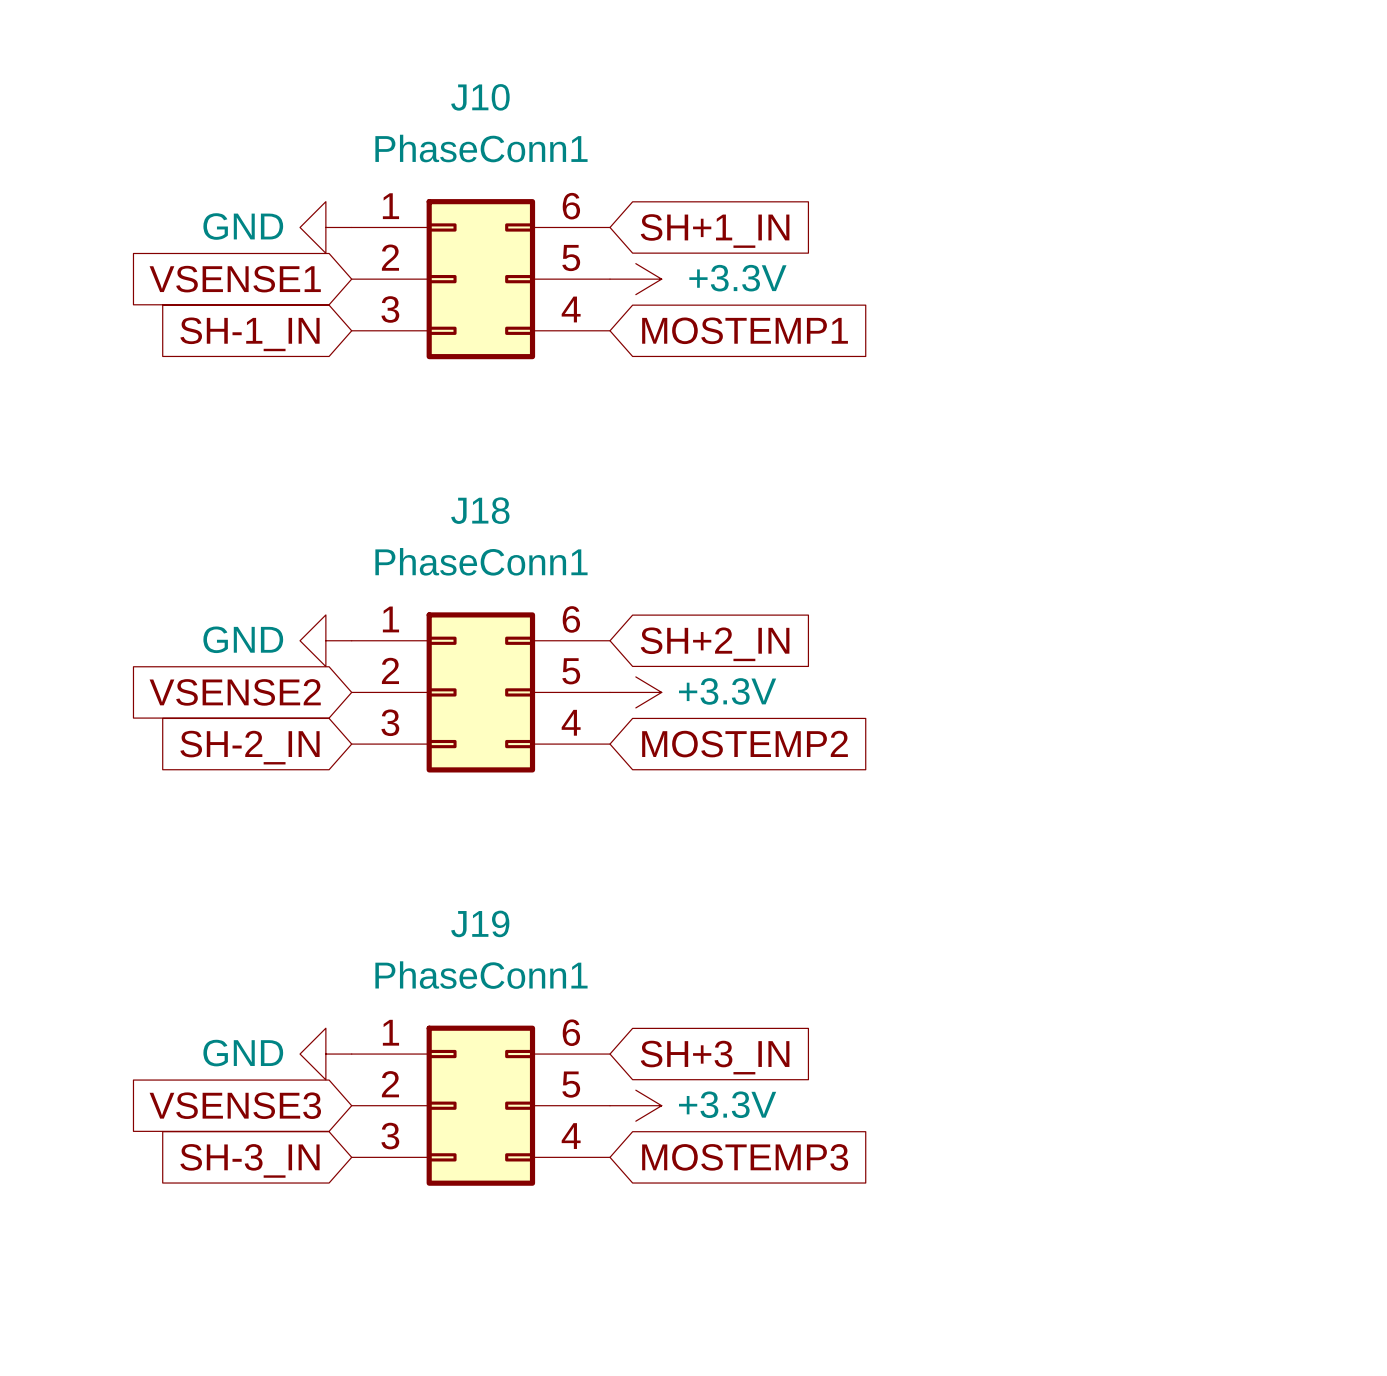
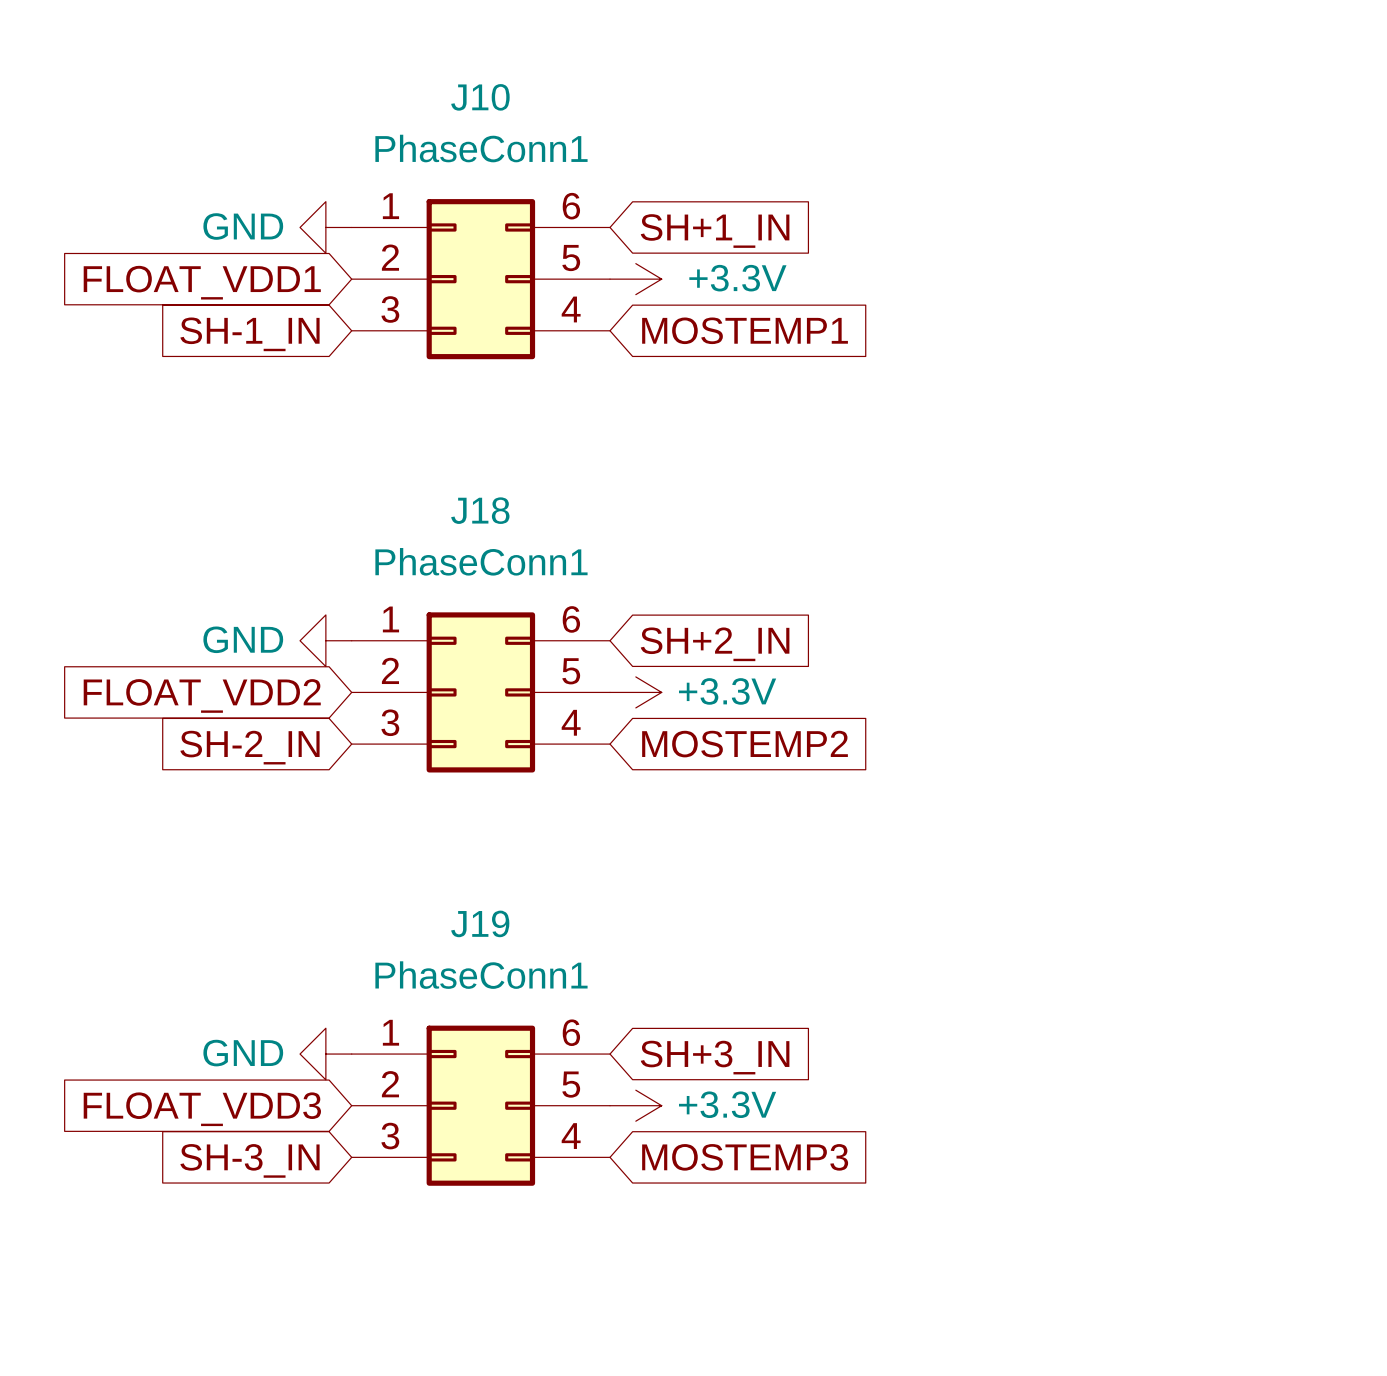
global label: VSENSE1 (235, 279) -> FLOAT_VDD1 (202, 282)
global label: VSENSE2 (235, 692) -> FLOAT_VDD2 (202, 695)
global label: VSENSE3 (235, 1105) -> FLOAT_VDD3 (202, 1109)

